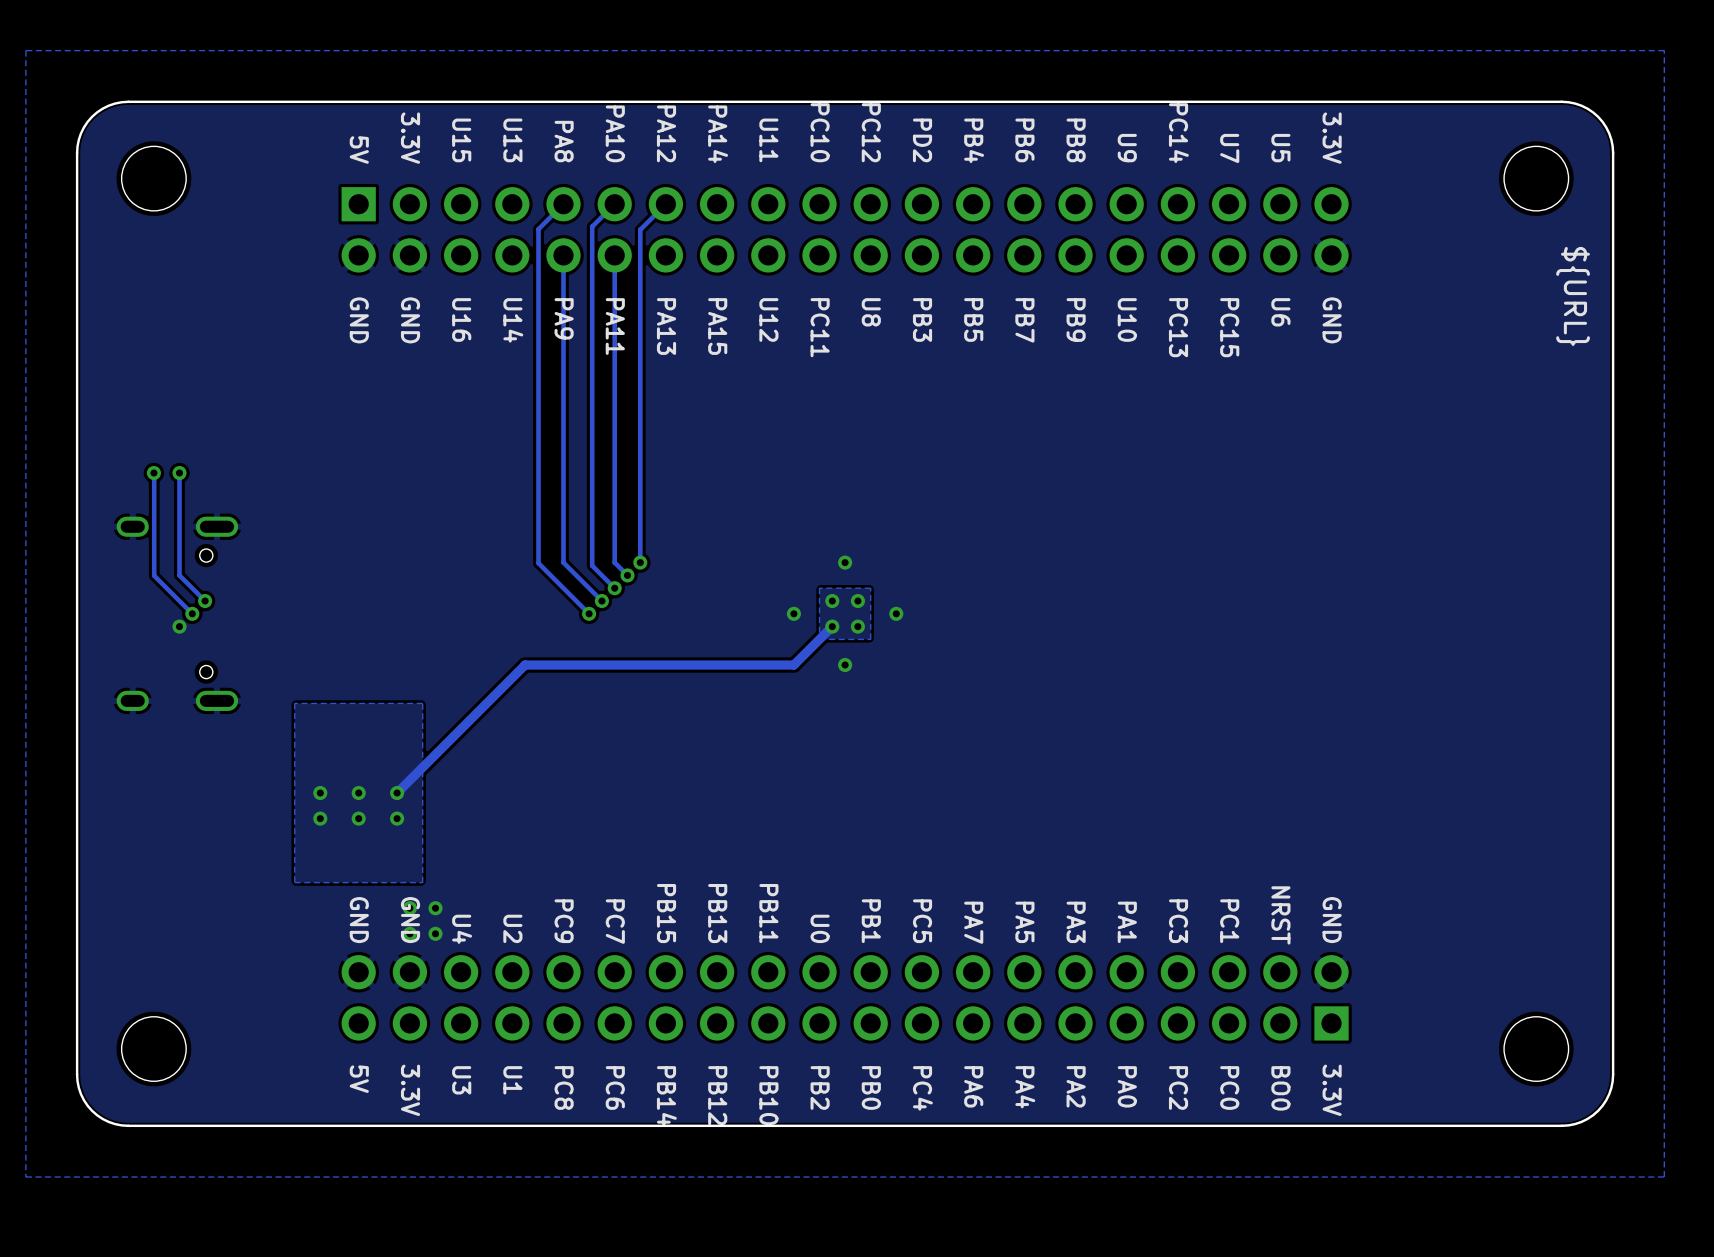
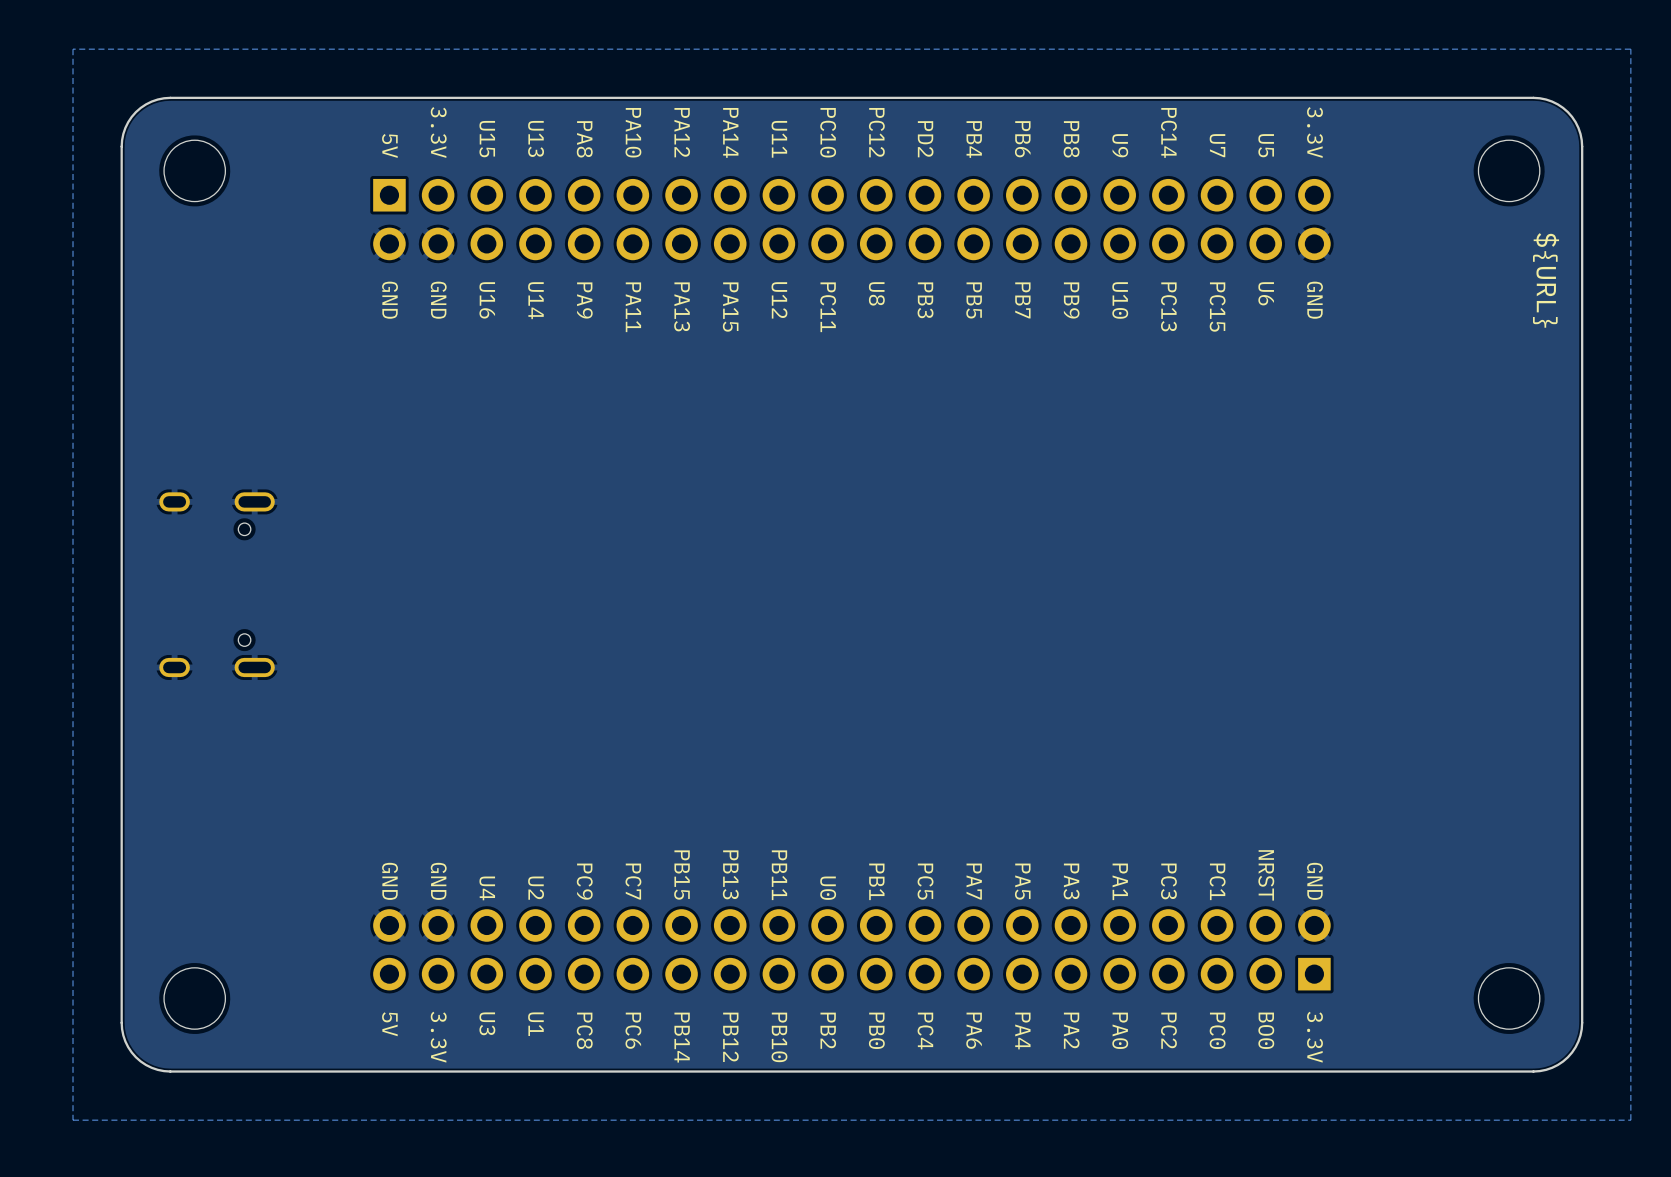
track: (563, 204) (538, 229) (538, 563) (589, 613) -> none
track: (614, 204) (592, 226) (592, 565) (614, 588) -> none
track: (665, 204) (640, 229) (640, 562) -> none
track: (563, 255) (563, 562) (601, 601) -> none
track: (614, 255) (614, 562) (627, 575) -> none
track: (153, 473) (154, 575) (192, 613) -> none
via: (153, 473) -> none
track: (179, 473) (179, 575) (205, 601) -> none
via: (179, 473) -> none
via: (640, 562) -> none
via: (845, 562) -> none
via: (627, 575) -> none
via: (614, 588) -> none
zone outline: (870, 588) (870, 639) (819, 639) (819, 588) (870, 588) -> none
via: (205, 601) -> none
via: (601, 601) -> none
via: (832, 601) -> none
via: (857, 601) -> none
via: (192, 613) -> none
via: (589, 613) -> none
via: (793, 613) -> none
via: (896, 613) -> none
via: (179, 626) -> none
track: (832, 626) (793, 665) (525, 665) (397, 793) -> none
via: (832, 626) -> none
via: (857, 626) -> none
via: (845, 665) -> none
zone outline: (422, 703) (422, 882) (294, 882) (294, 703) (422, 703) -> none
via: (320, 793) -> none
via: (358, 793) -> none
via: (397, 793) -> none
via: (320, 818) -> none
via: (358, 818) -> none
via: (397, 818) -> none
via: (409, 908) -> none
via: (435, 908) -> none
via: (409, 933) -> none
via: (435, 933) -> none

